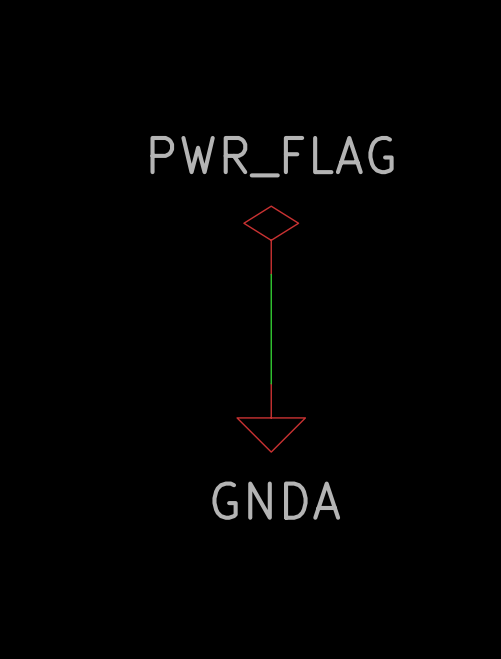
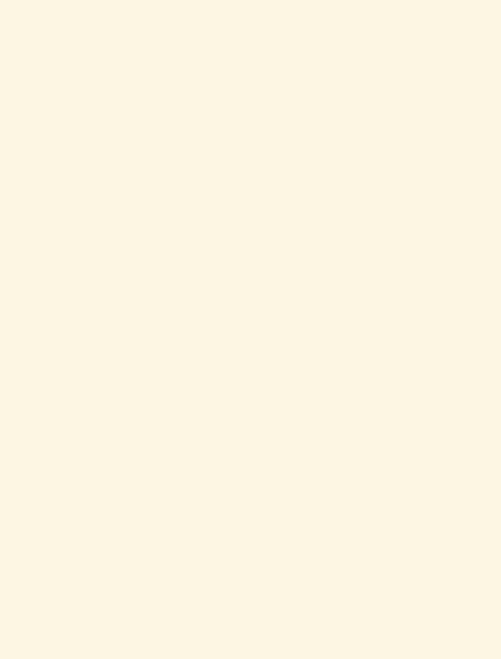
power symbol: PWR_FLAG (271, 240) -> none
wire: (271, 274) (271, 383) -> none
power symbol: GNDA (271, 417) -> none

